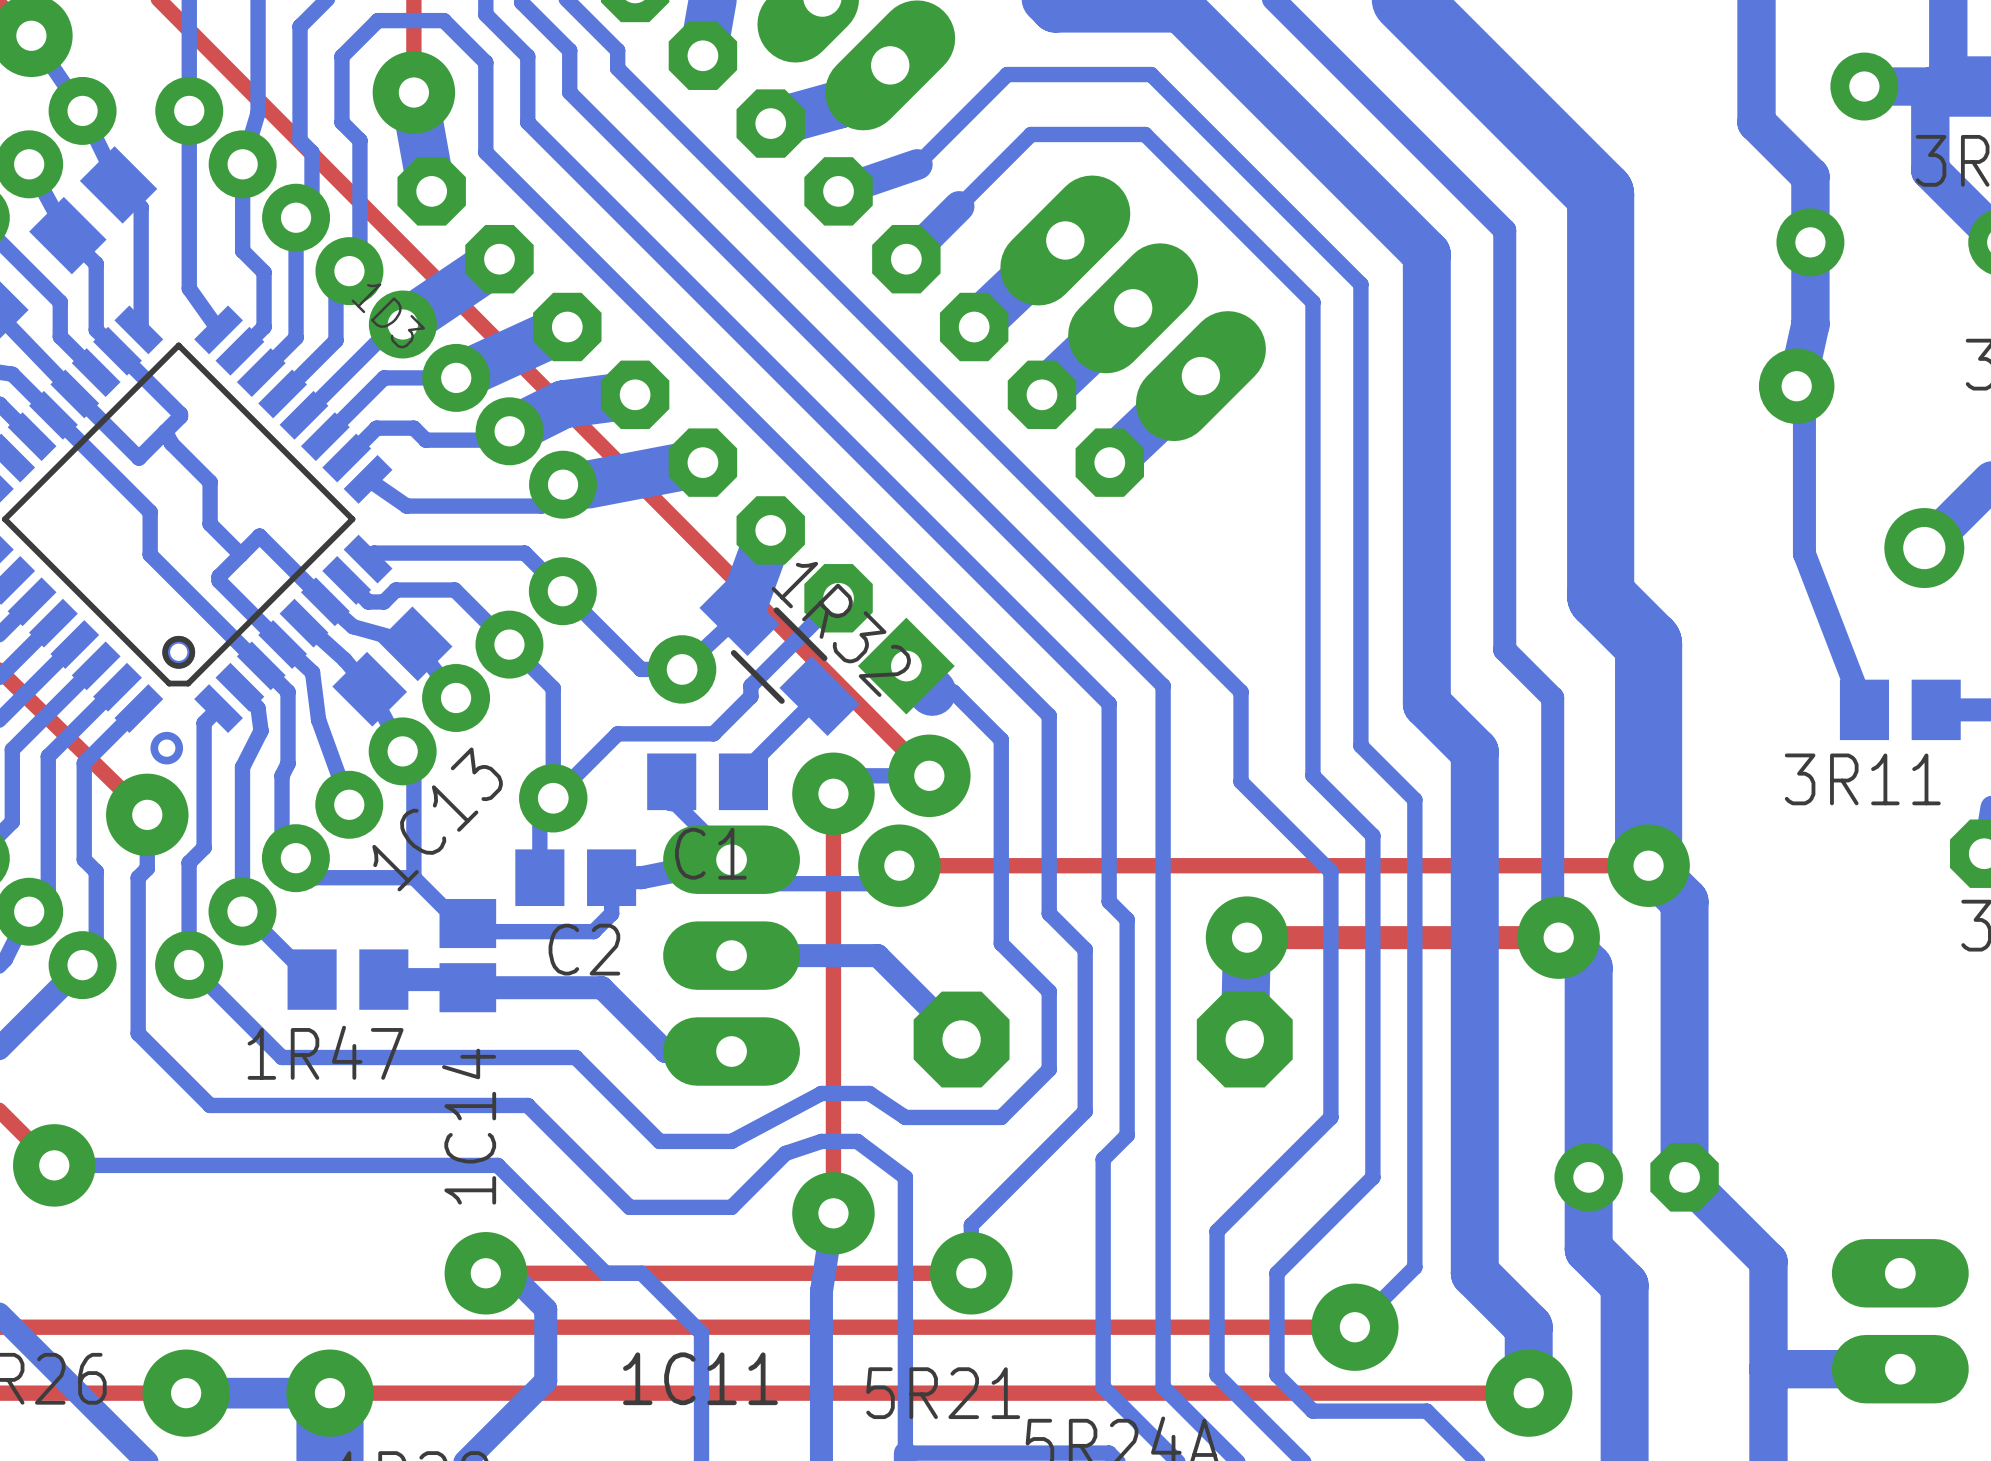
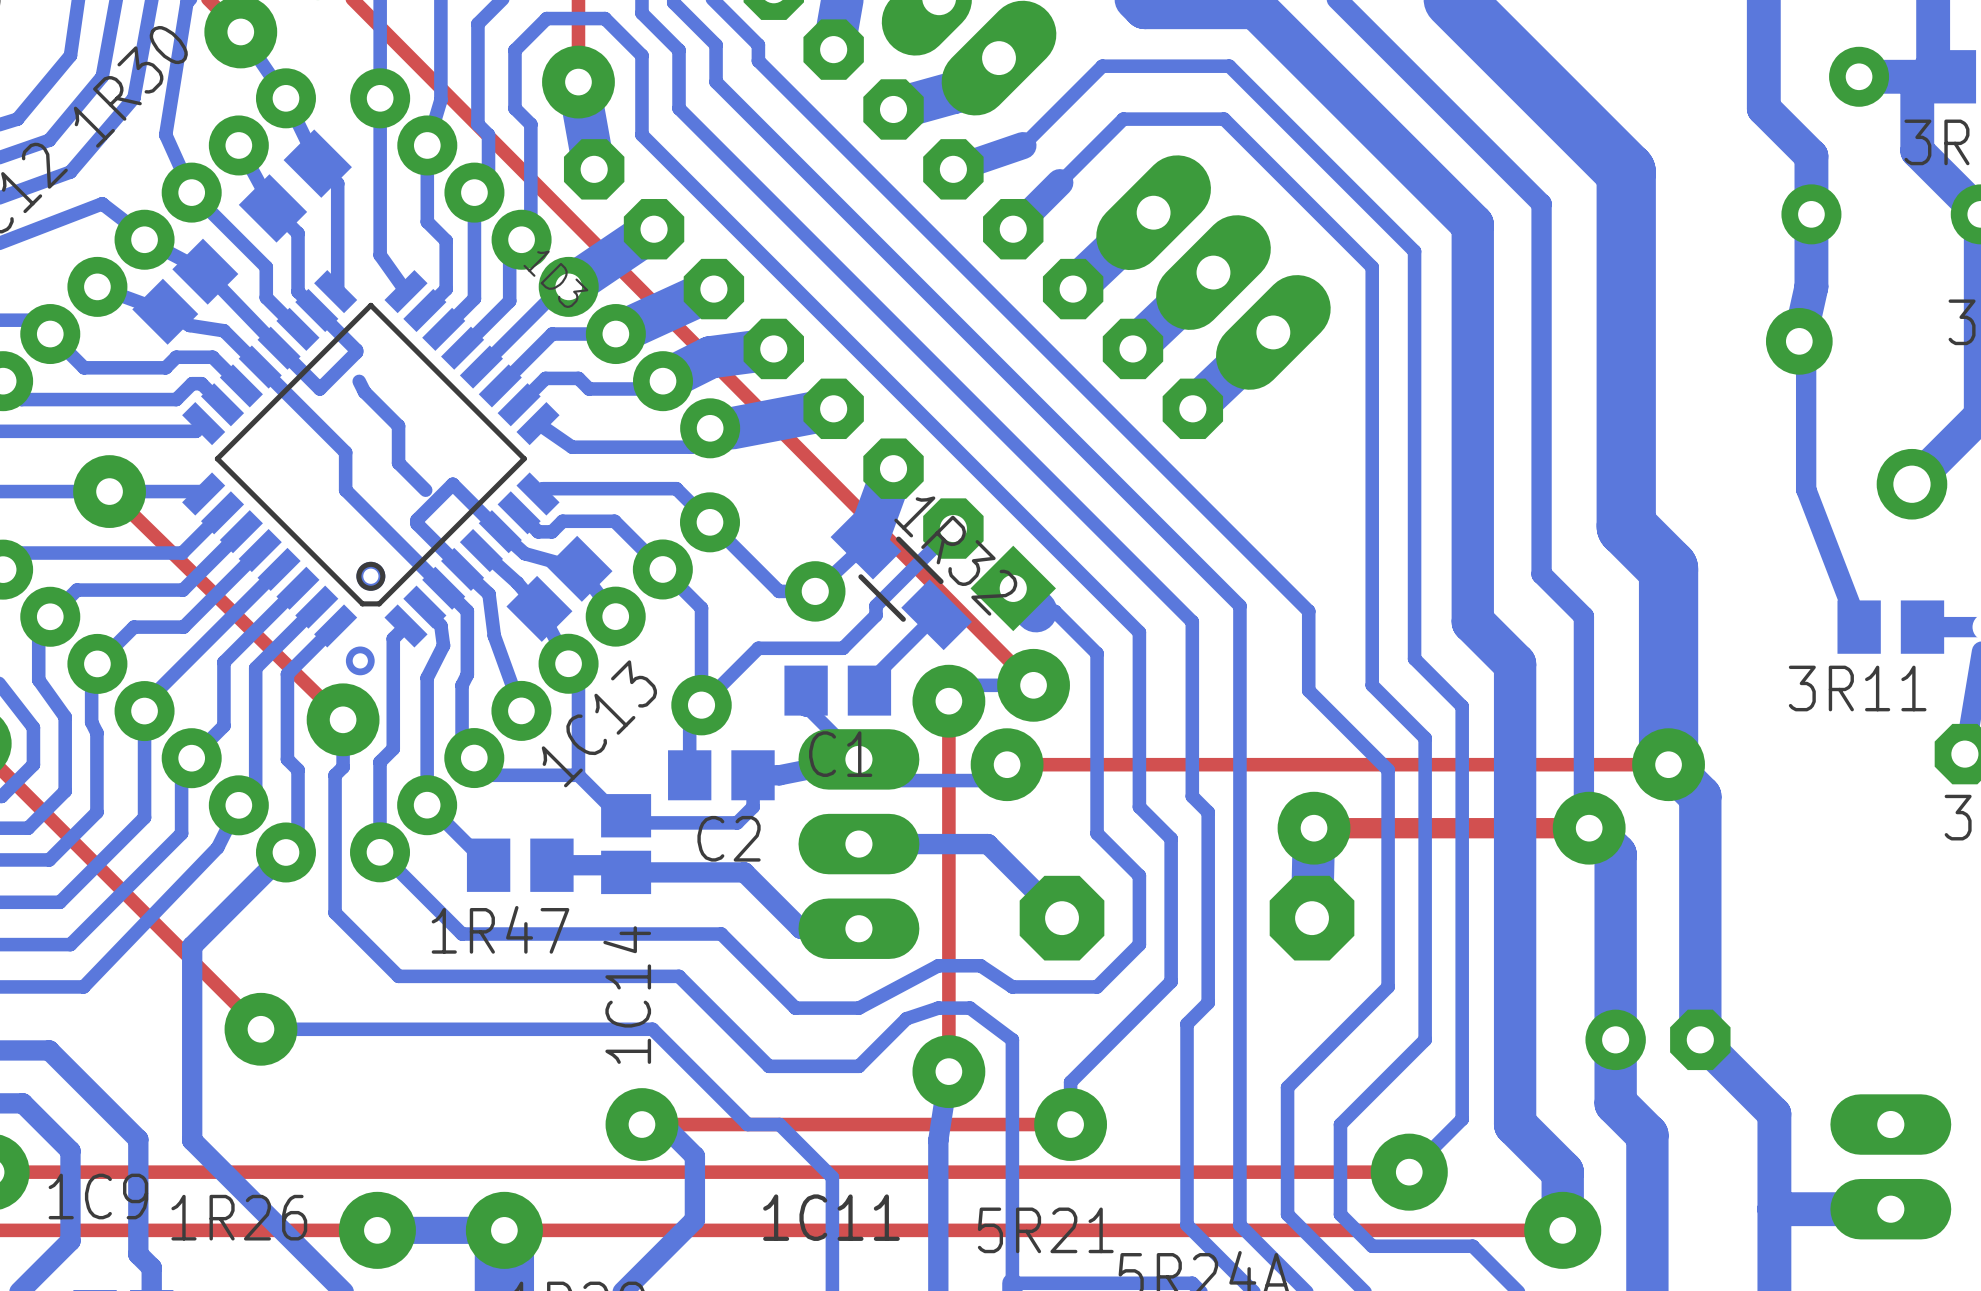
bottom track: (162, 396) (180, 414) (180, 416) (138, 458) (120, 440) -> (356, 350) (319, 388)
bottom track: (271, 548) (259, 536) (219, 576) (219, 580) (231, 592) -> (452, 484) (417, 519) (417, 523)

